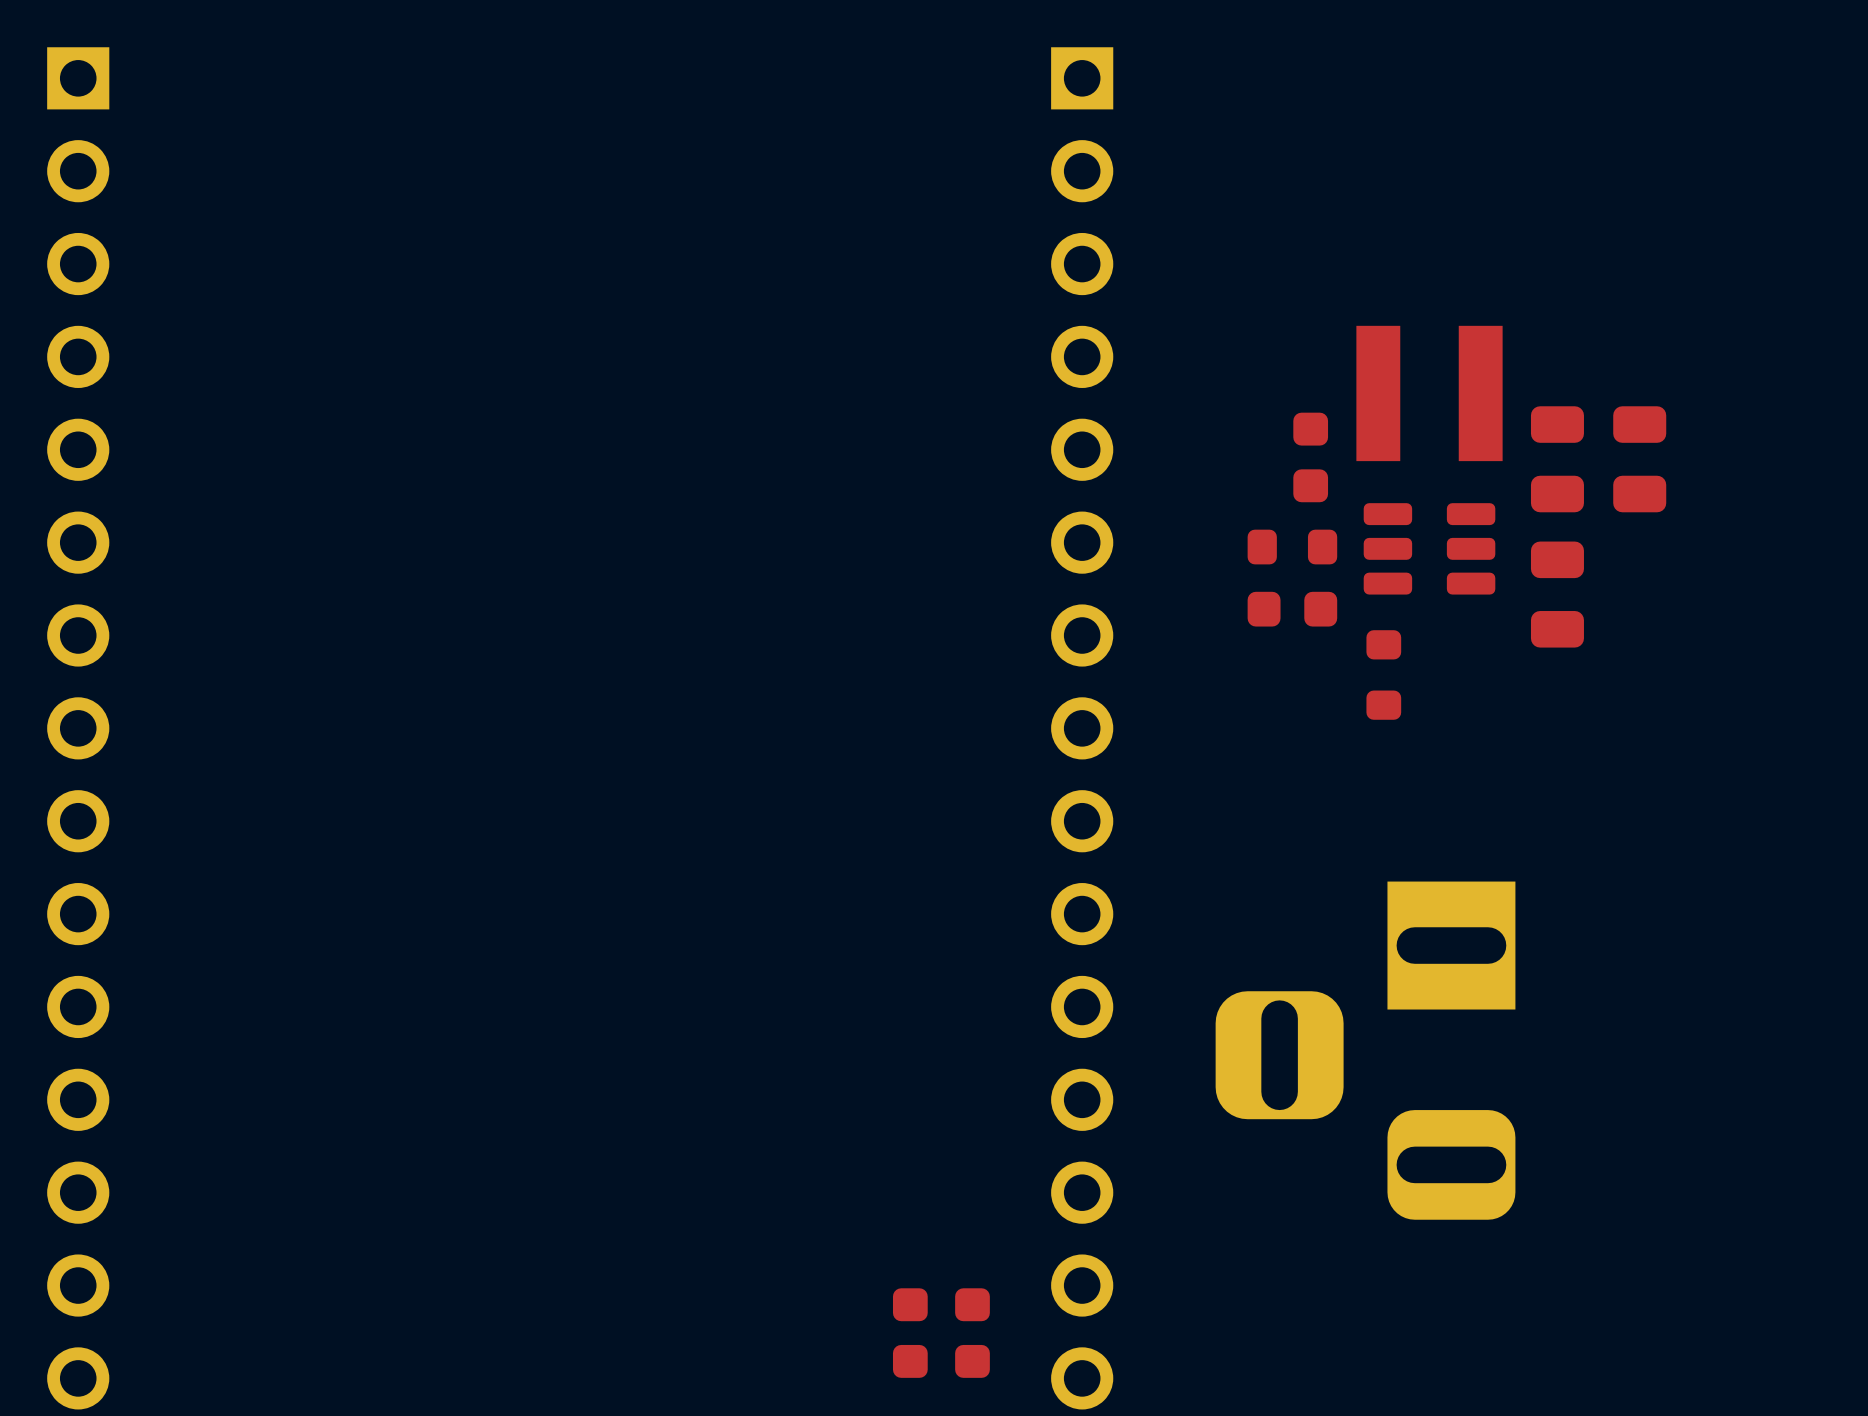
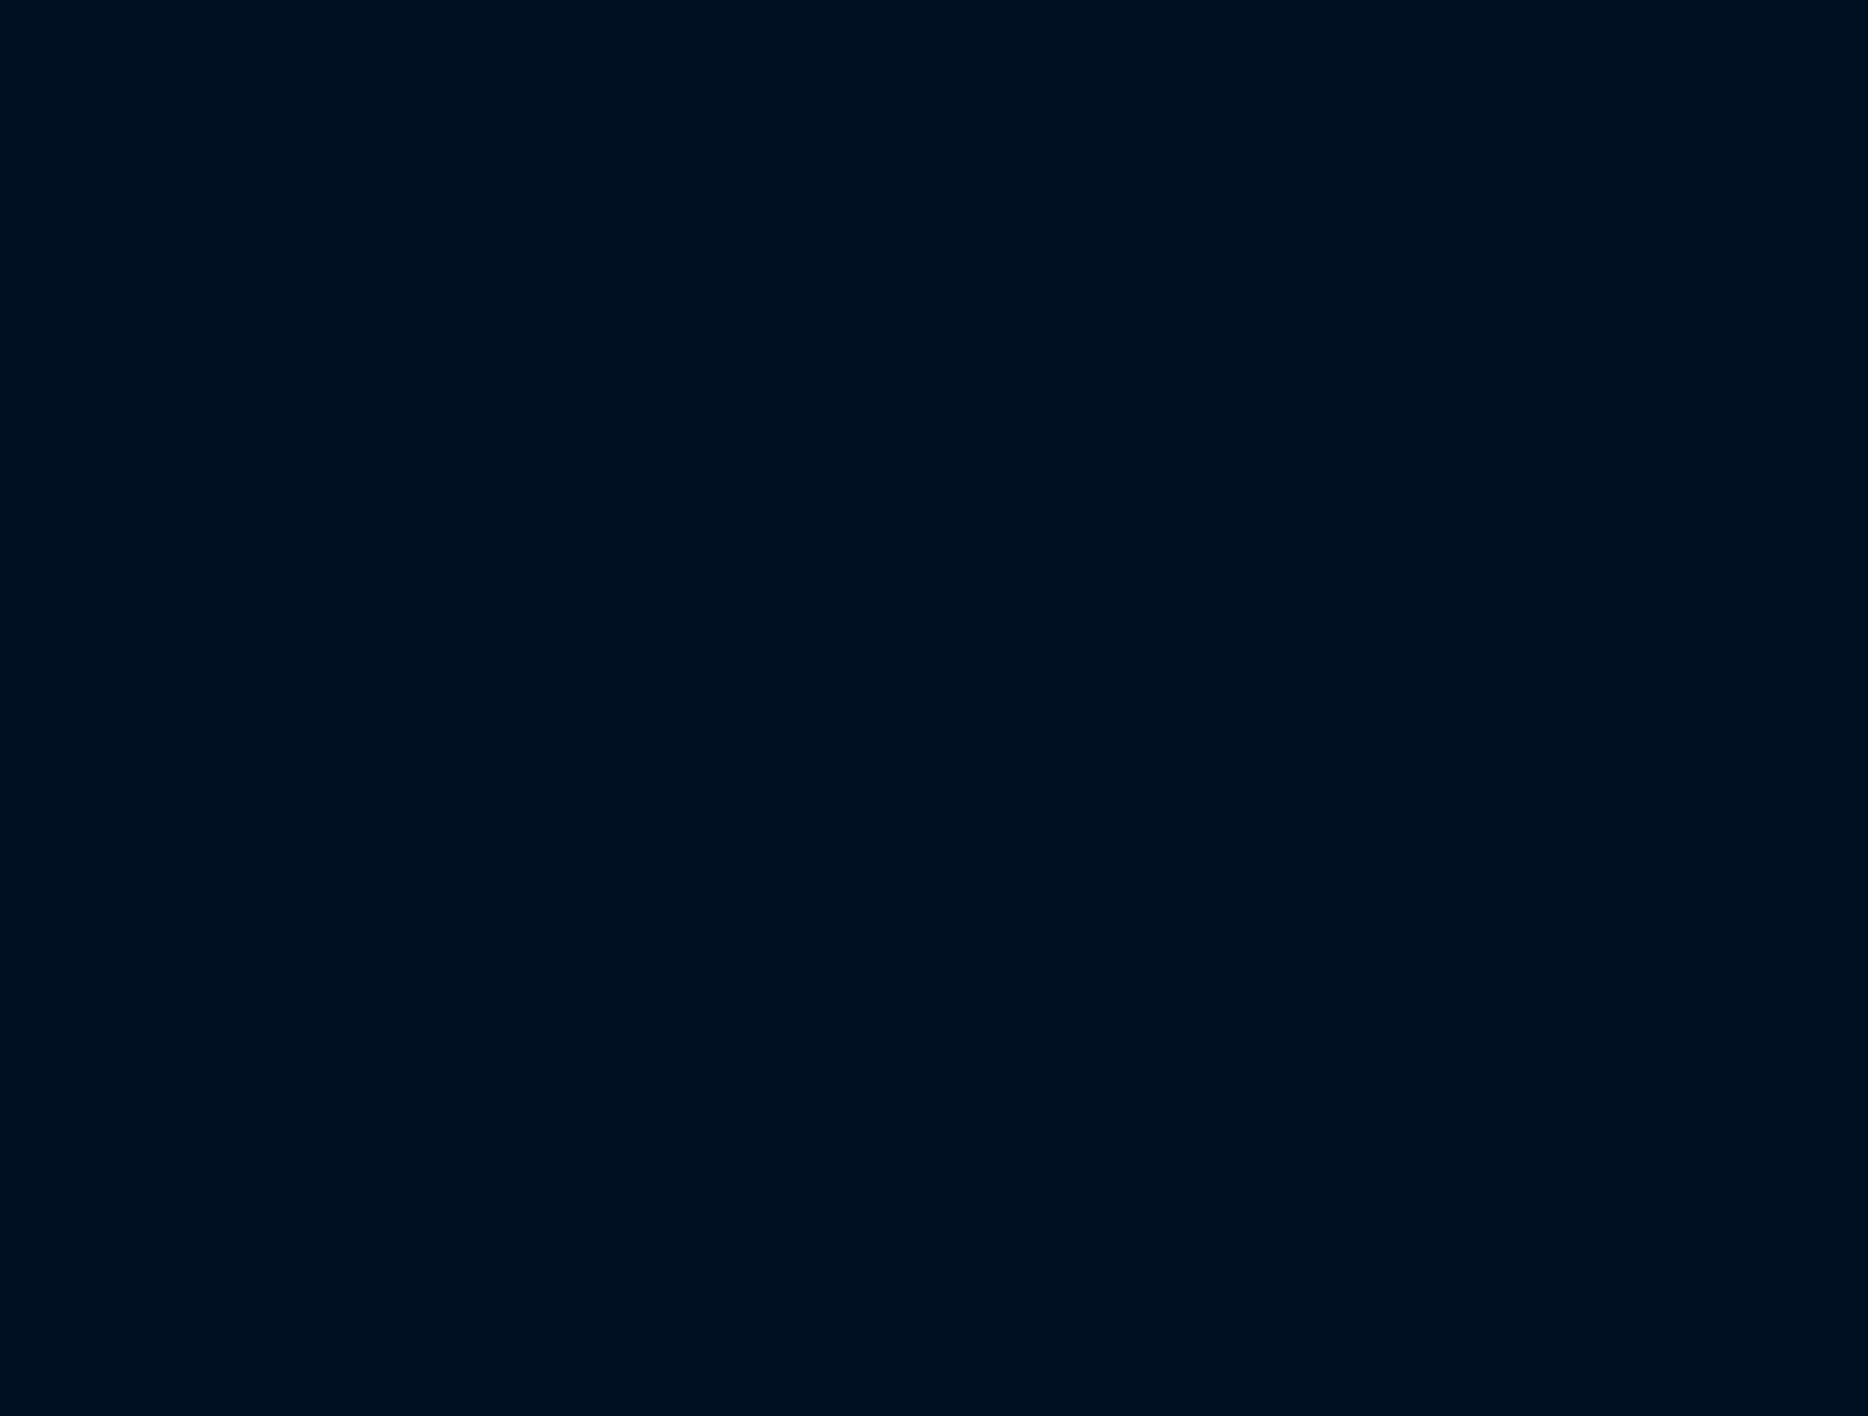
part: (1429, 393) -> none
part: (1310, 457) -> none
part: (1557, 459) -> none
part: (1639, 459) -> none
part: (1292, 547) -> none
part: (1429, 548) -> none
part: (1557, 594) -> none
part: (1292, 609) -> none
part: (1383, 674) -> none
part: (78, 728) -> none
part: (1082, 728) -> none
part: (1365, 1050) -> none
part: (910, 1333) -> none
part: (972, 1333) -> none

